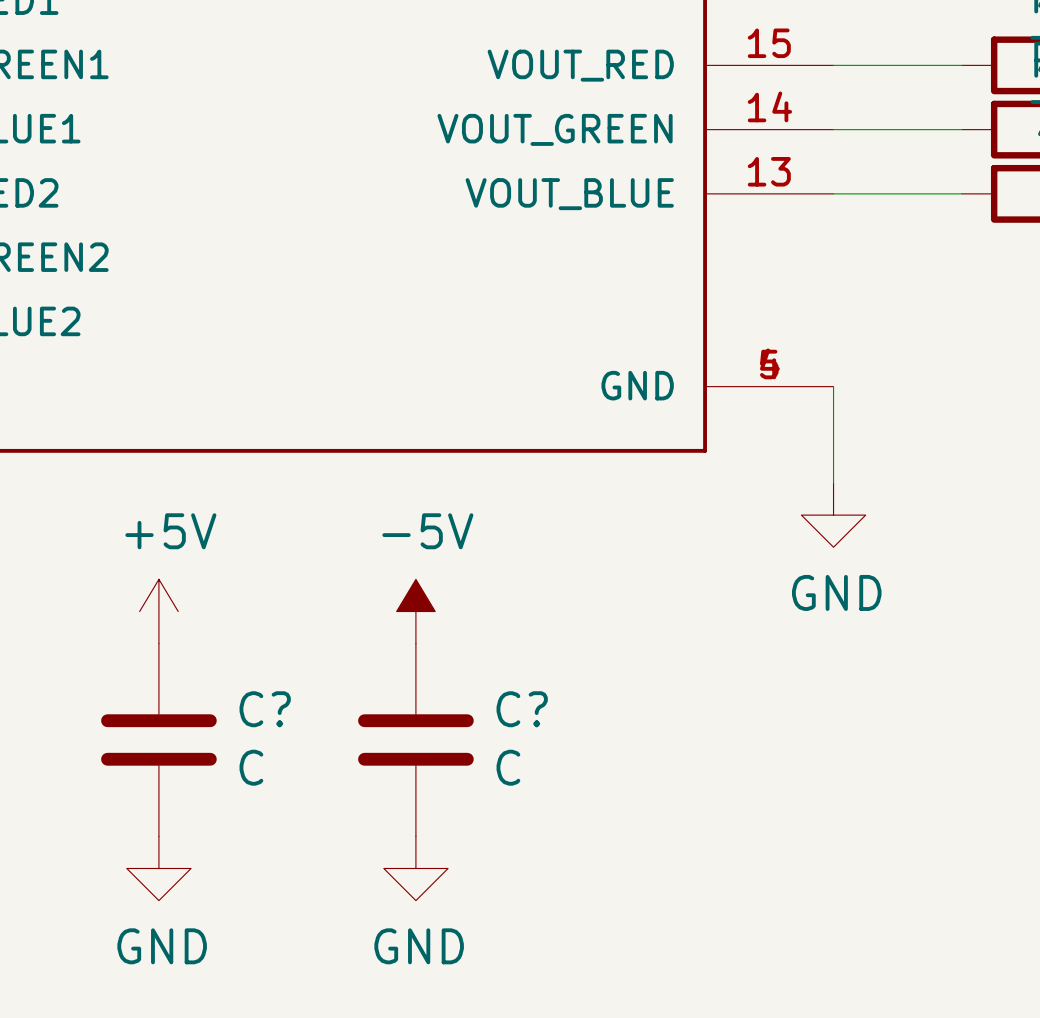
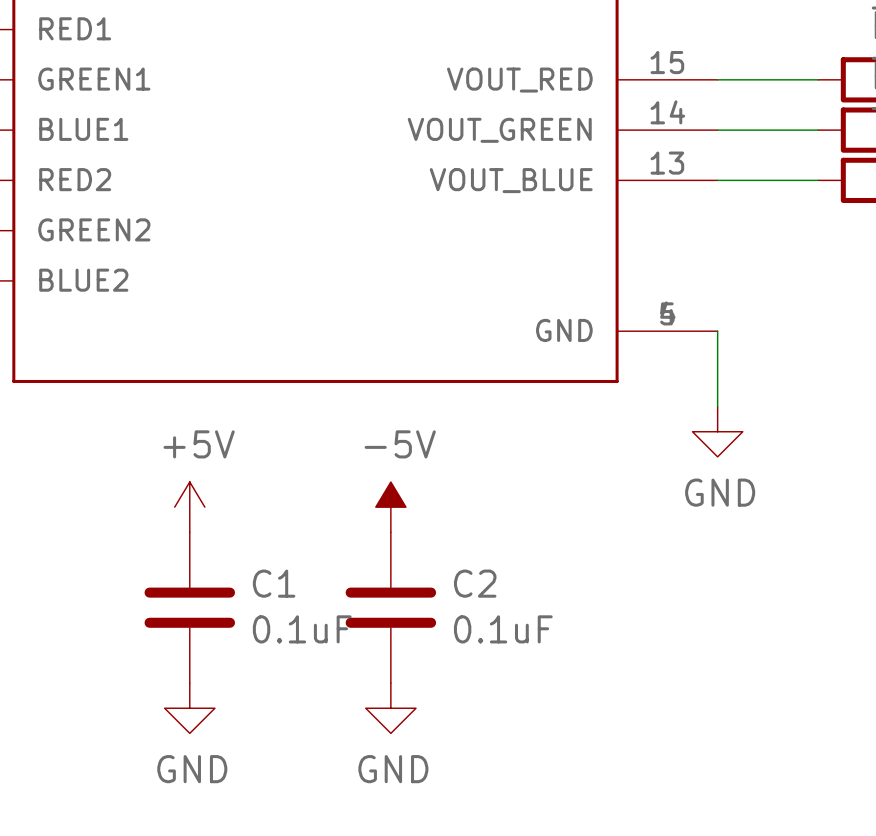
C? name: C? (265, 709) -> C1 (274, 583)
C? name: C? (522, 709) -> C2 (475, 583)
C? value: C (251, 767) -> 0.1uF (302, 629)
C? value: C (508, 767) -> 0.1uF (503, 629)

